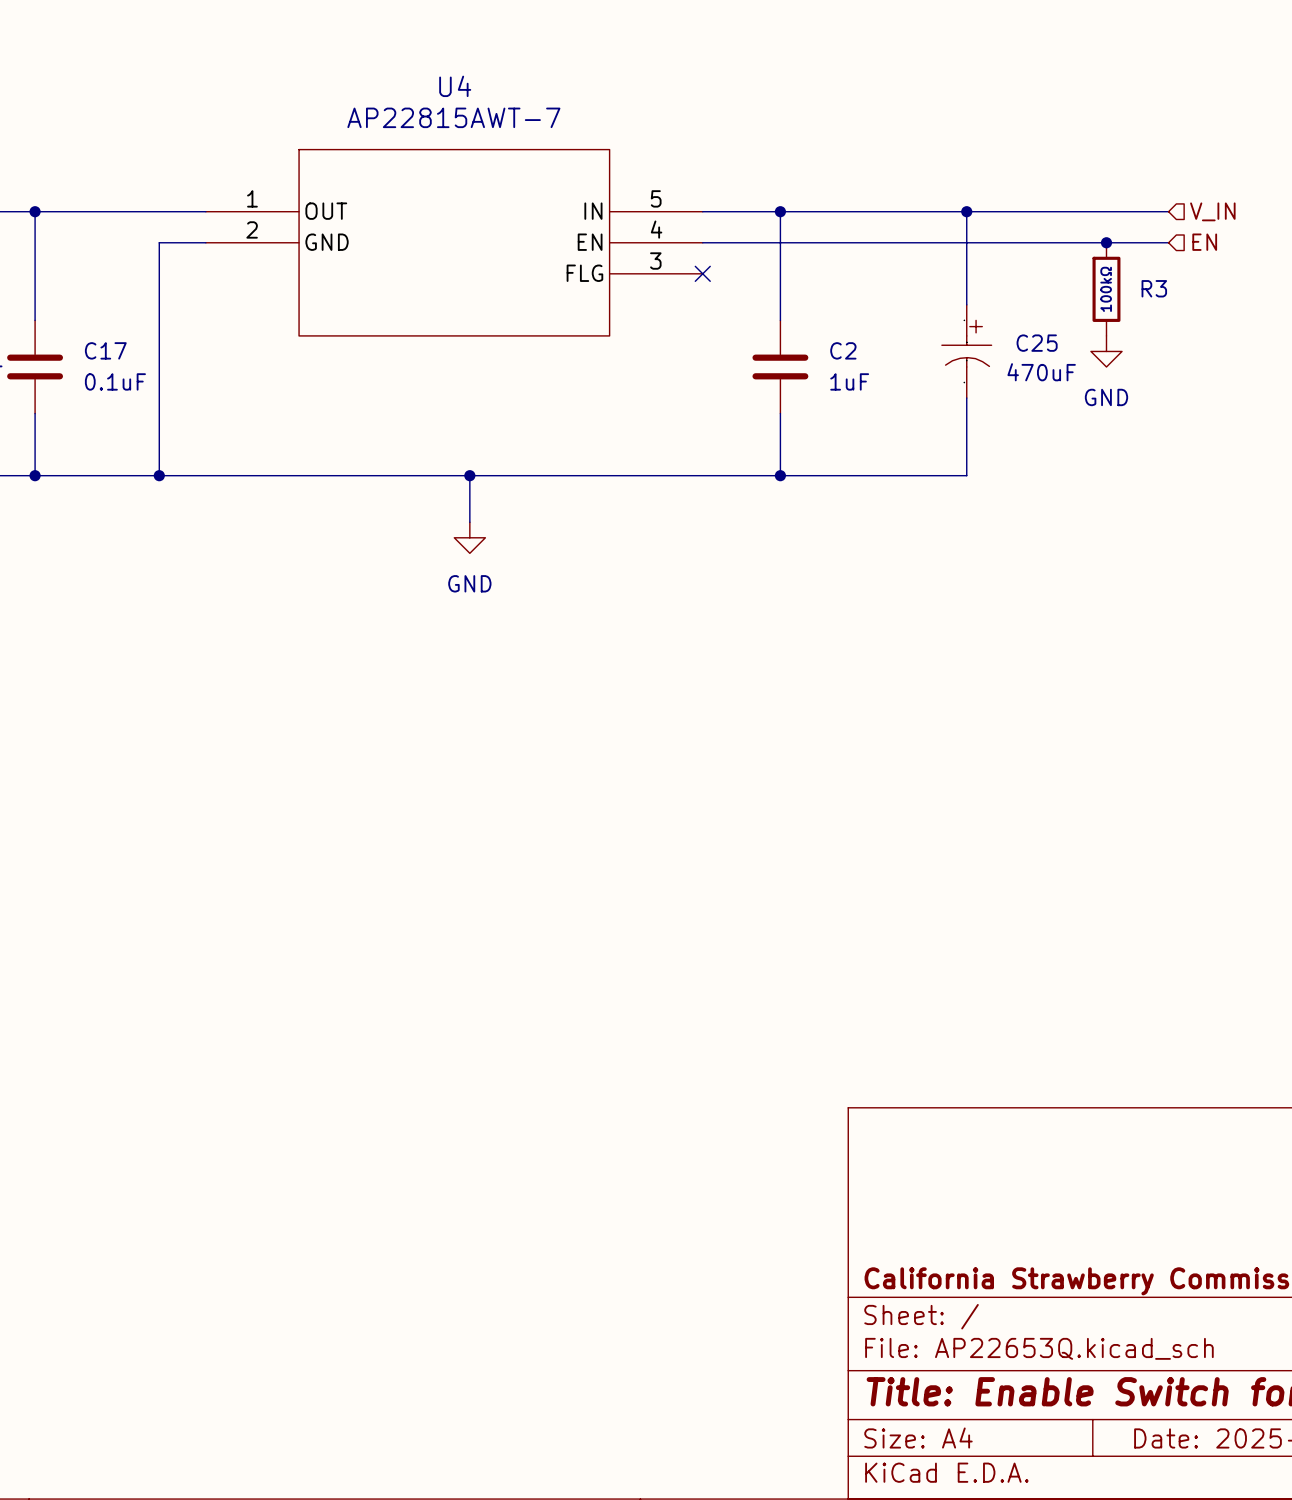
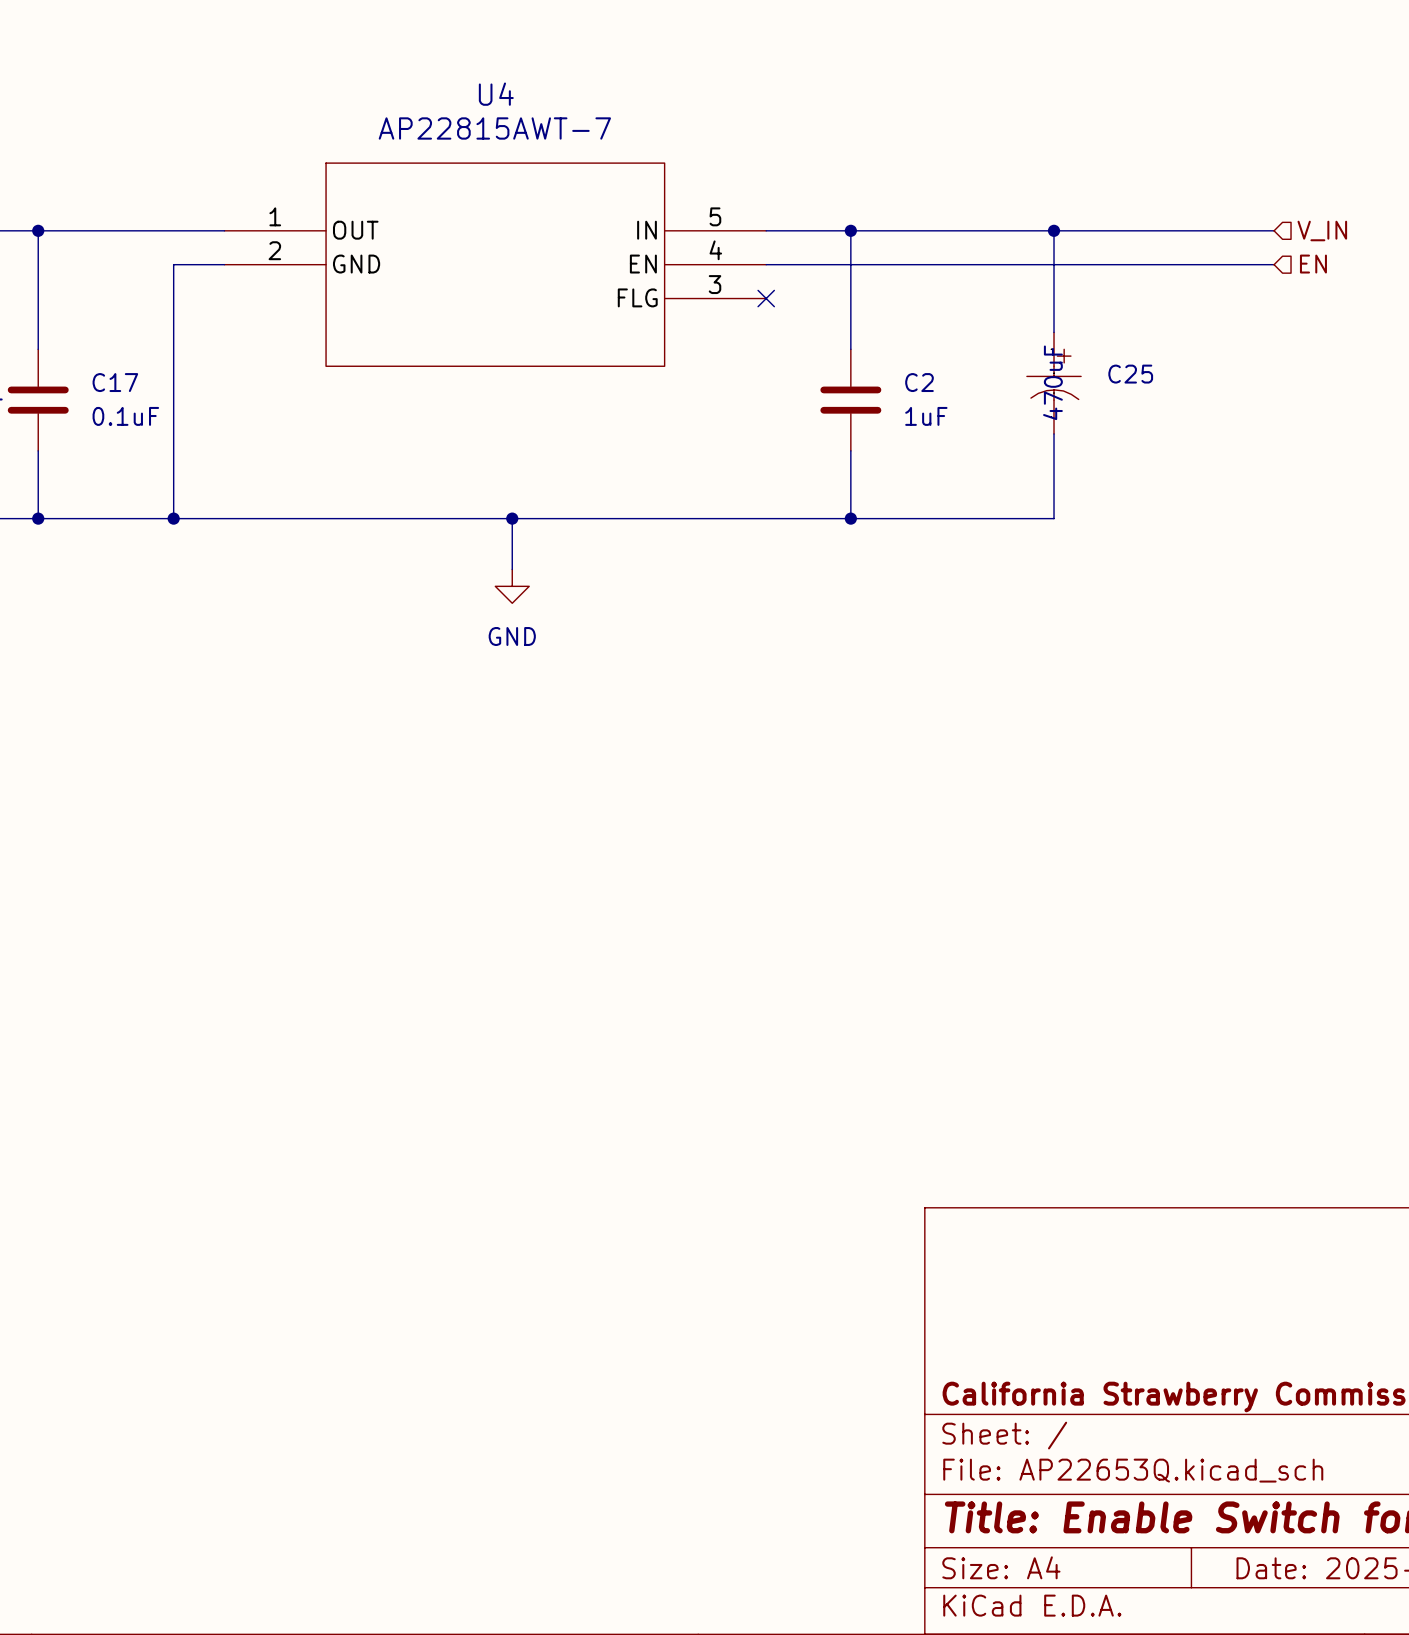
junction: (1106, 242) -> none
R3: 100kΩ (1106, 289) -> none
power symbol: GND (1106, 351) -> none
C25 value rotation: 0° (1041, 372) -> 90° counterclockwise (1052, 382)

